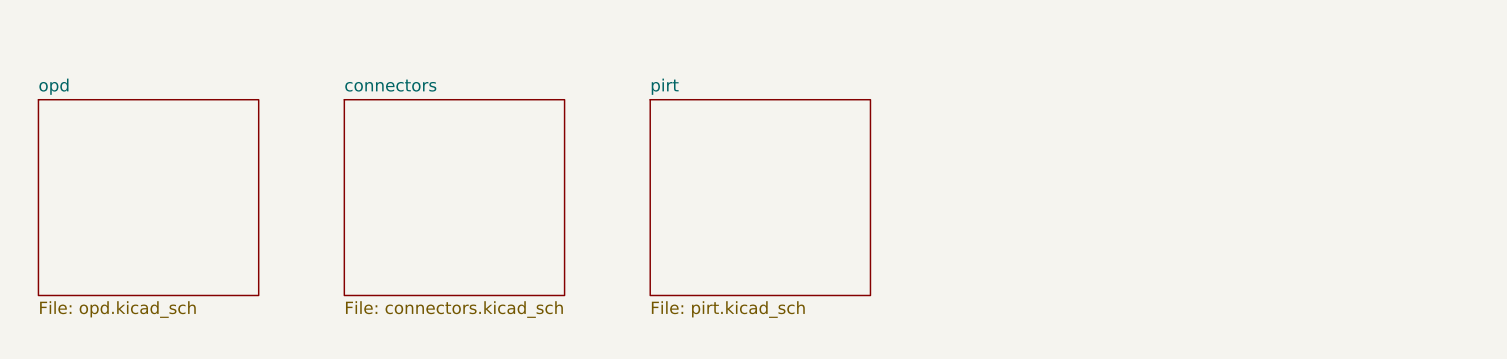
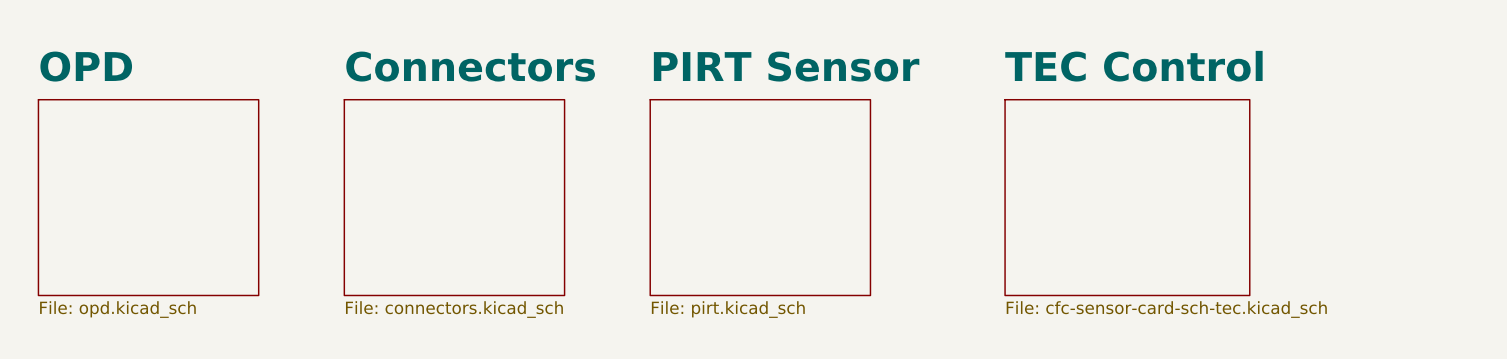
sheet connectors name: connectors (390, 85) -> Connectors (470, 66)
sheet opd name: opd (53, 86) -> OPD (86, 66)
sheet pirt name: pirt (665, 86) -> PIRT Sensor (786, 66)
sheet TEC Control: none -> File: cfc-sensor-card-sch-tec.kicad_sch (1127, 197)

